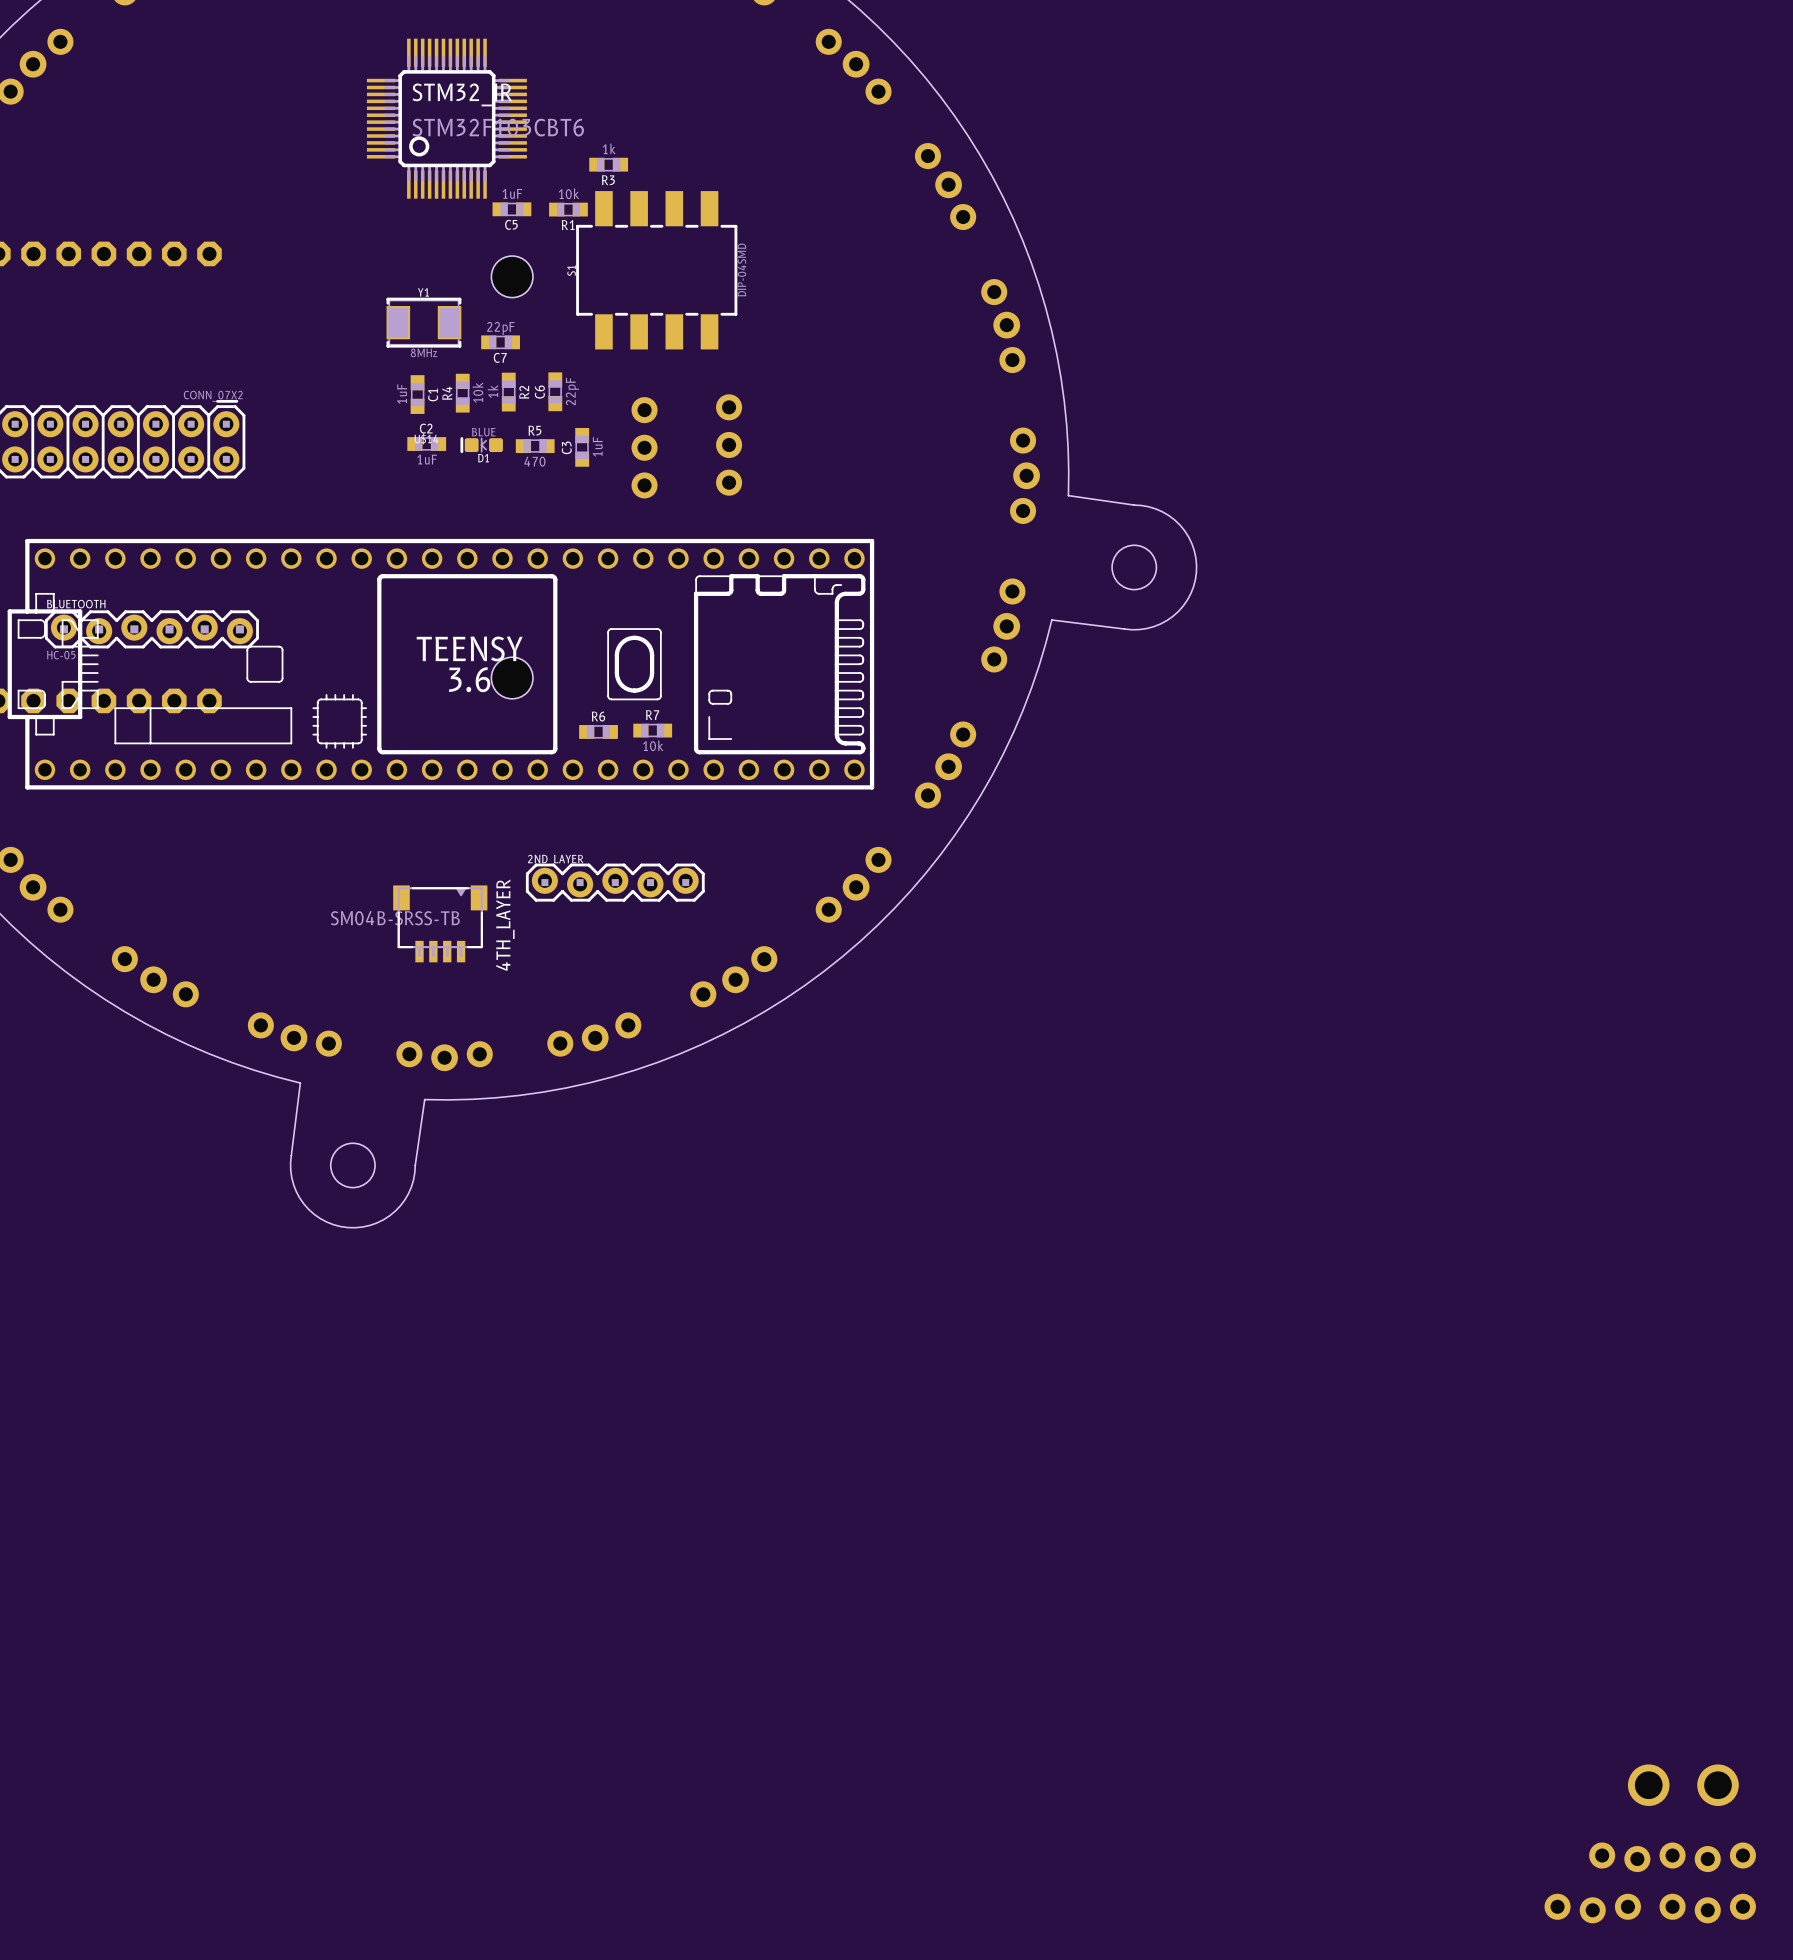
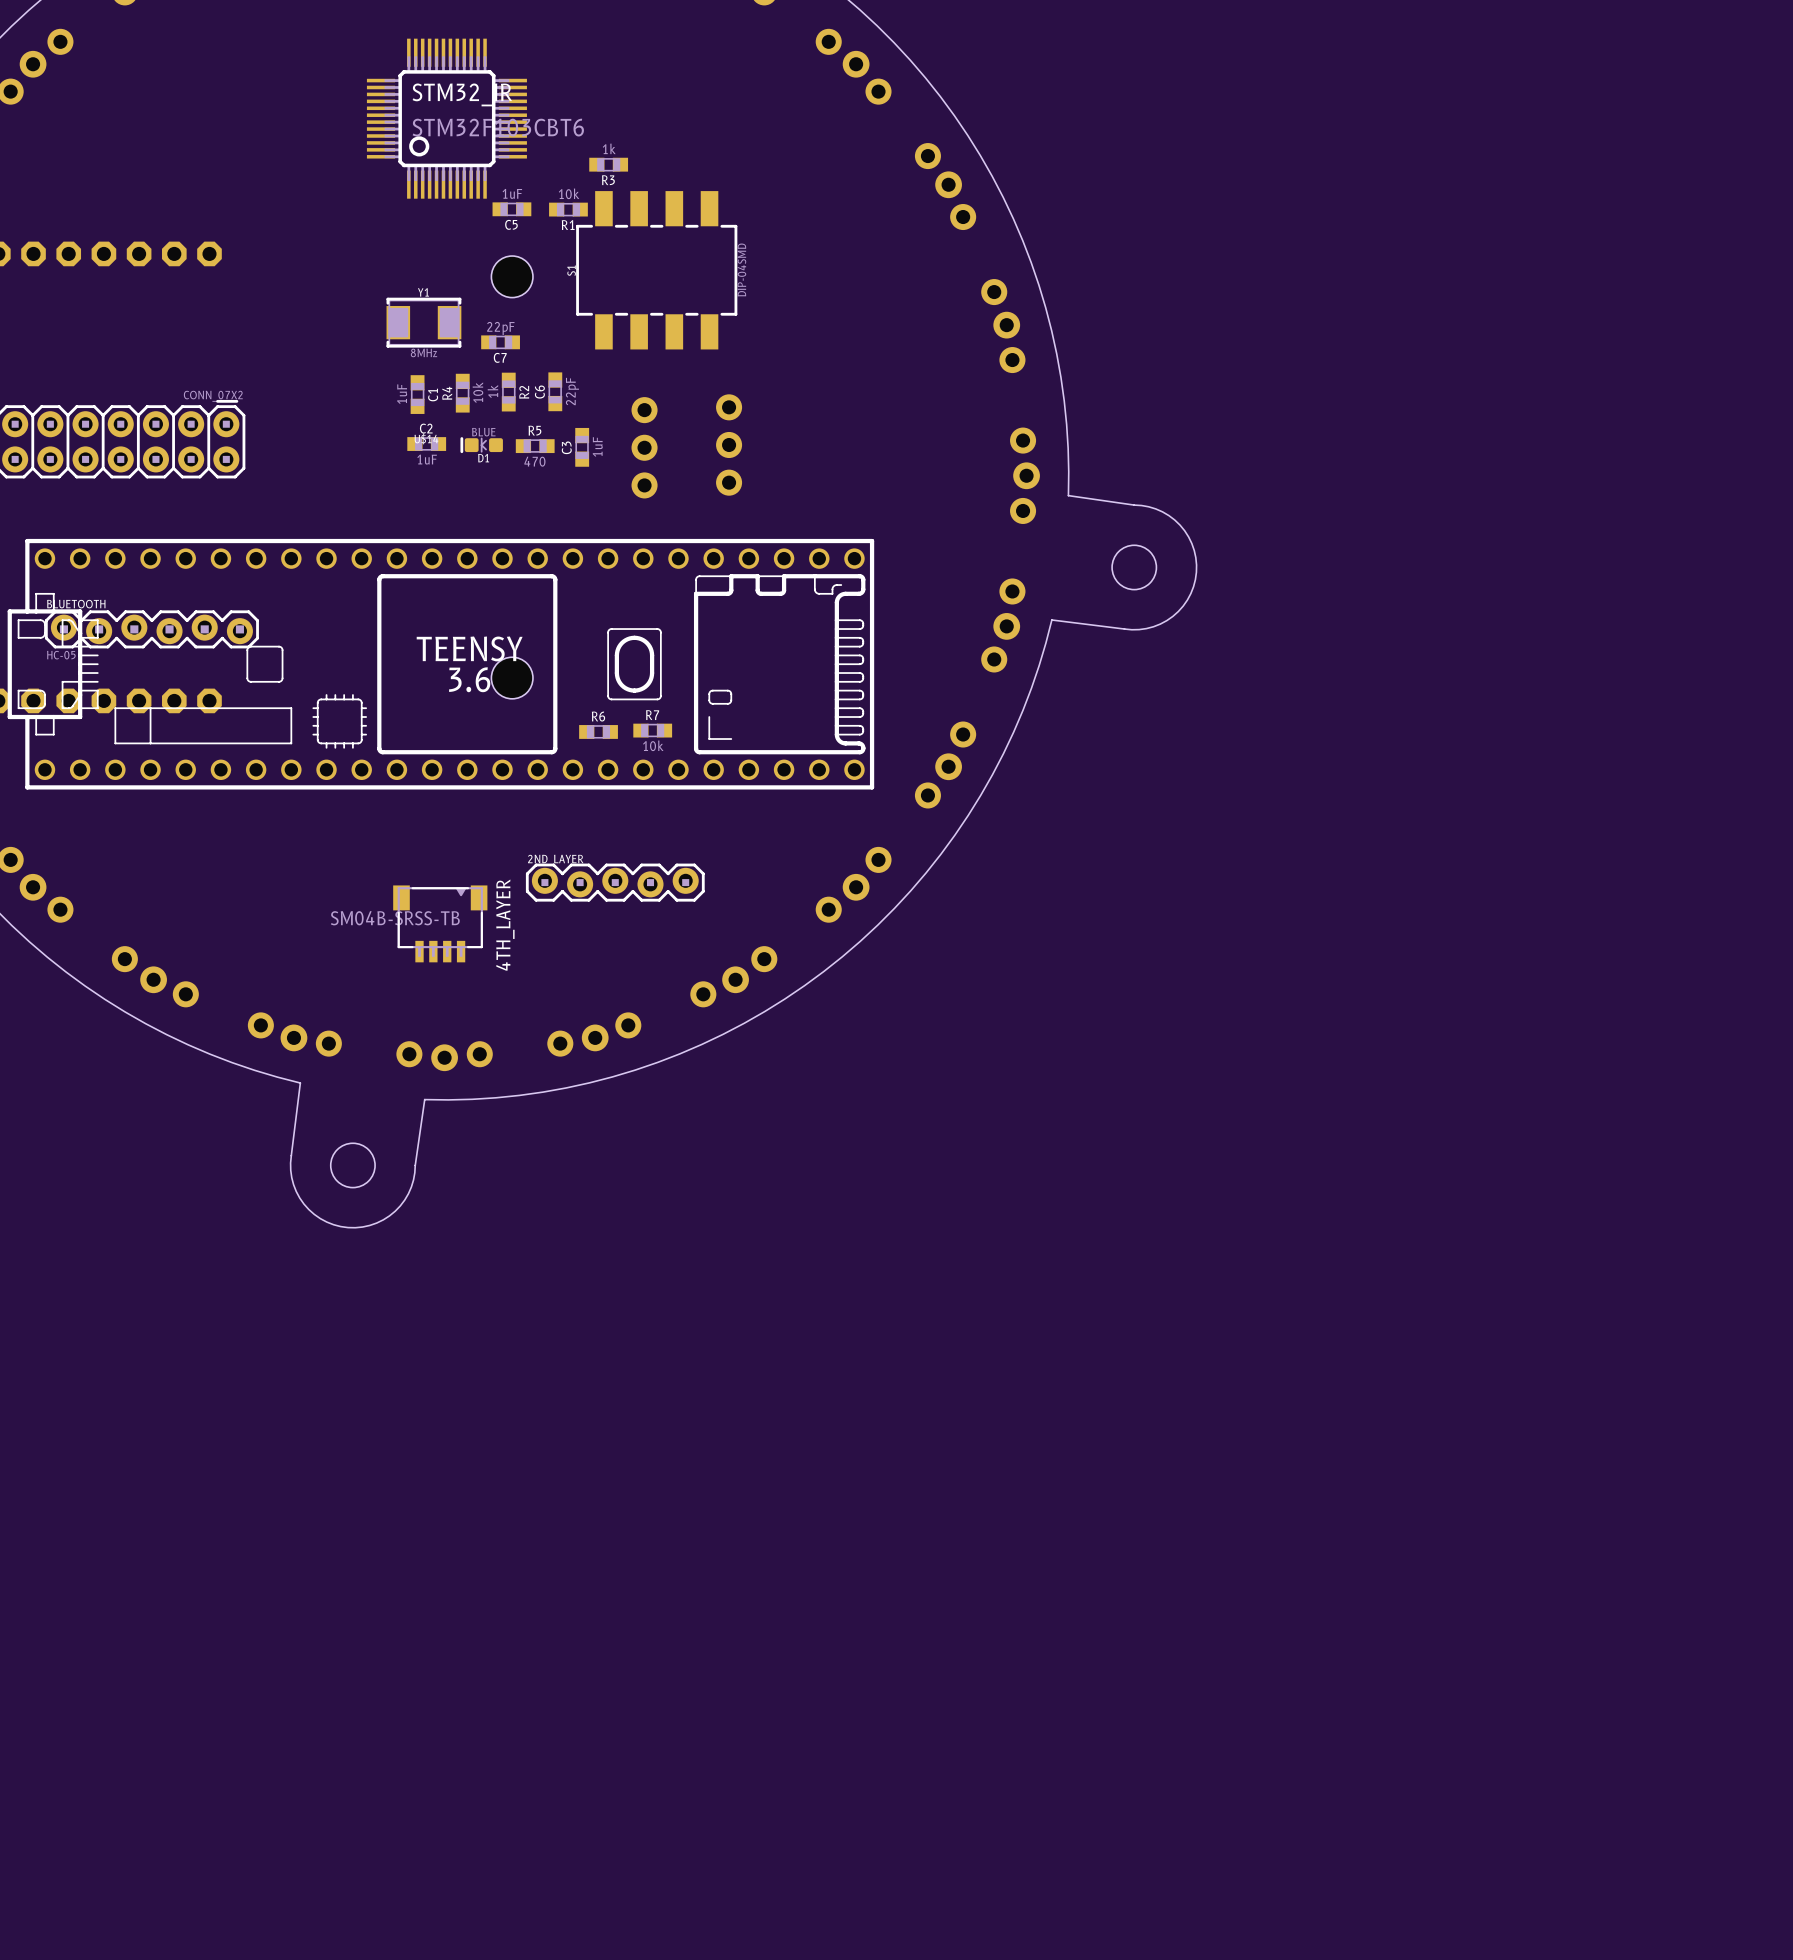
part: (1683, 1785) -> none
part: (1672, 1857) -> none
part: (1592, 1908) -> none
part: (1707, 1908) -> none

